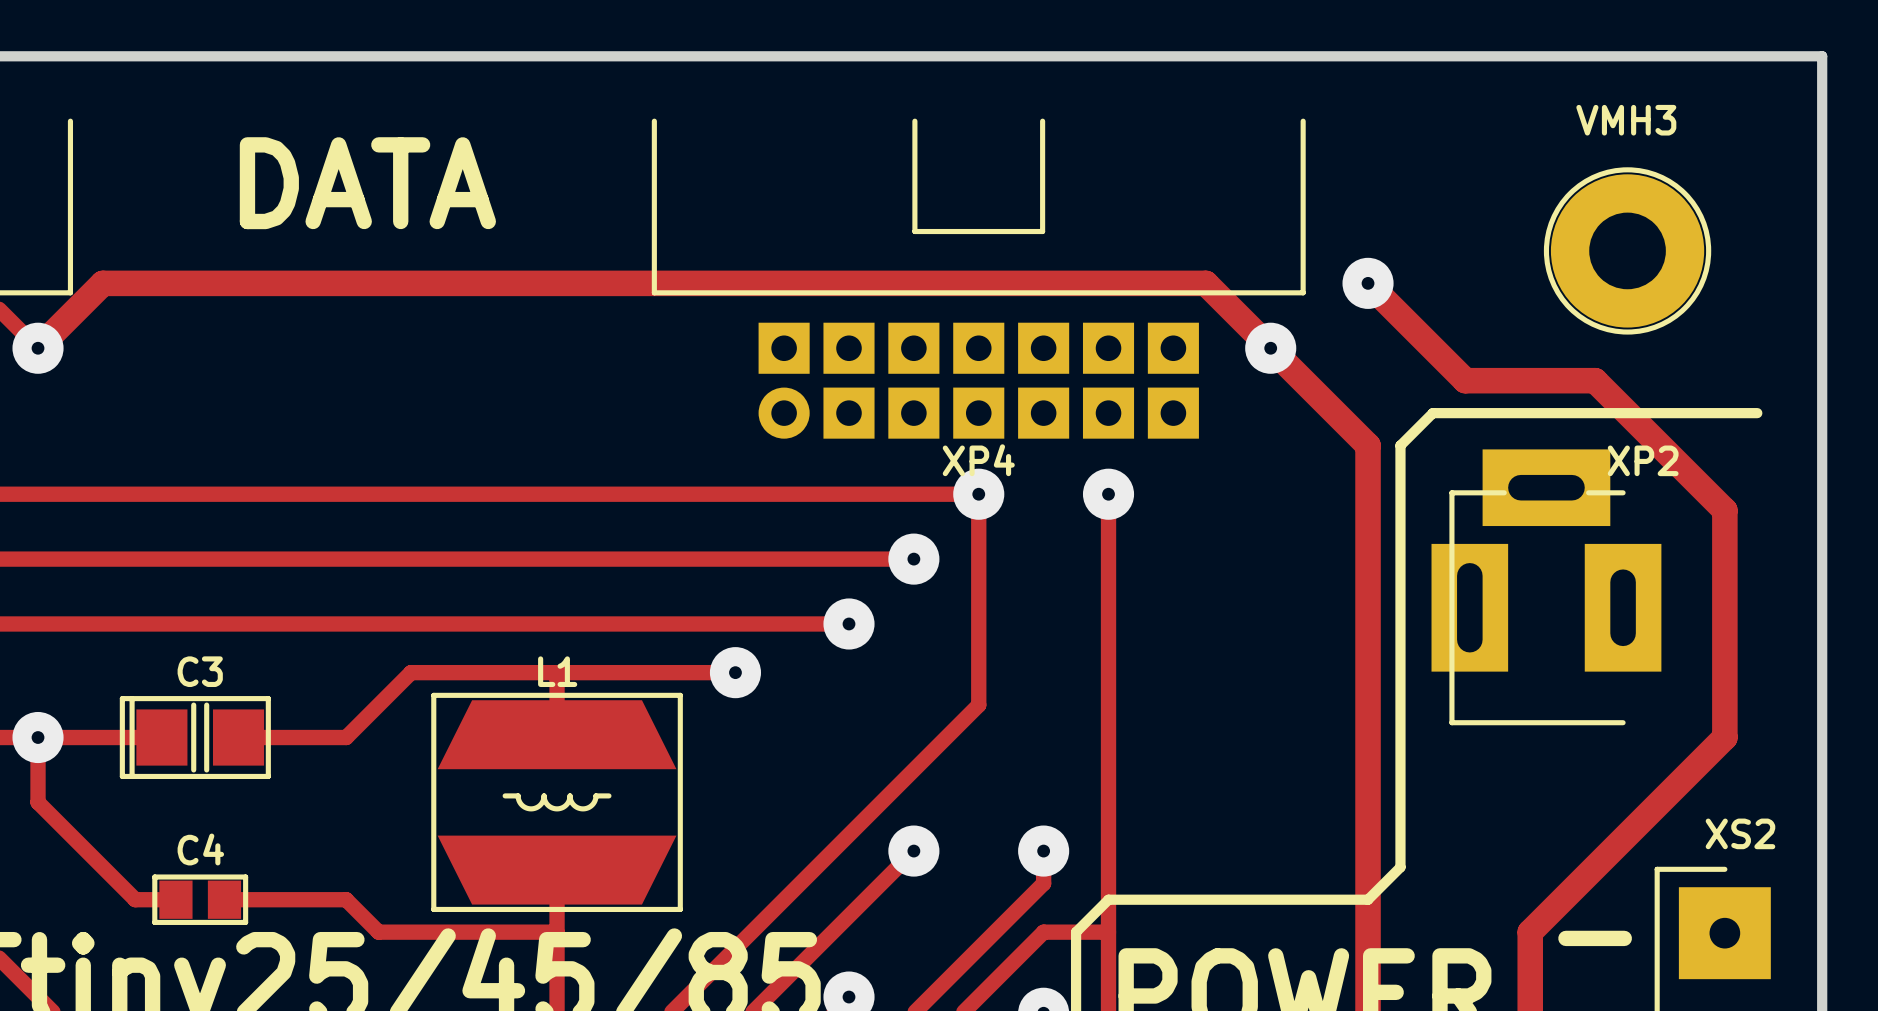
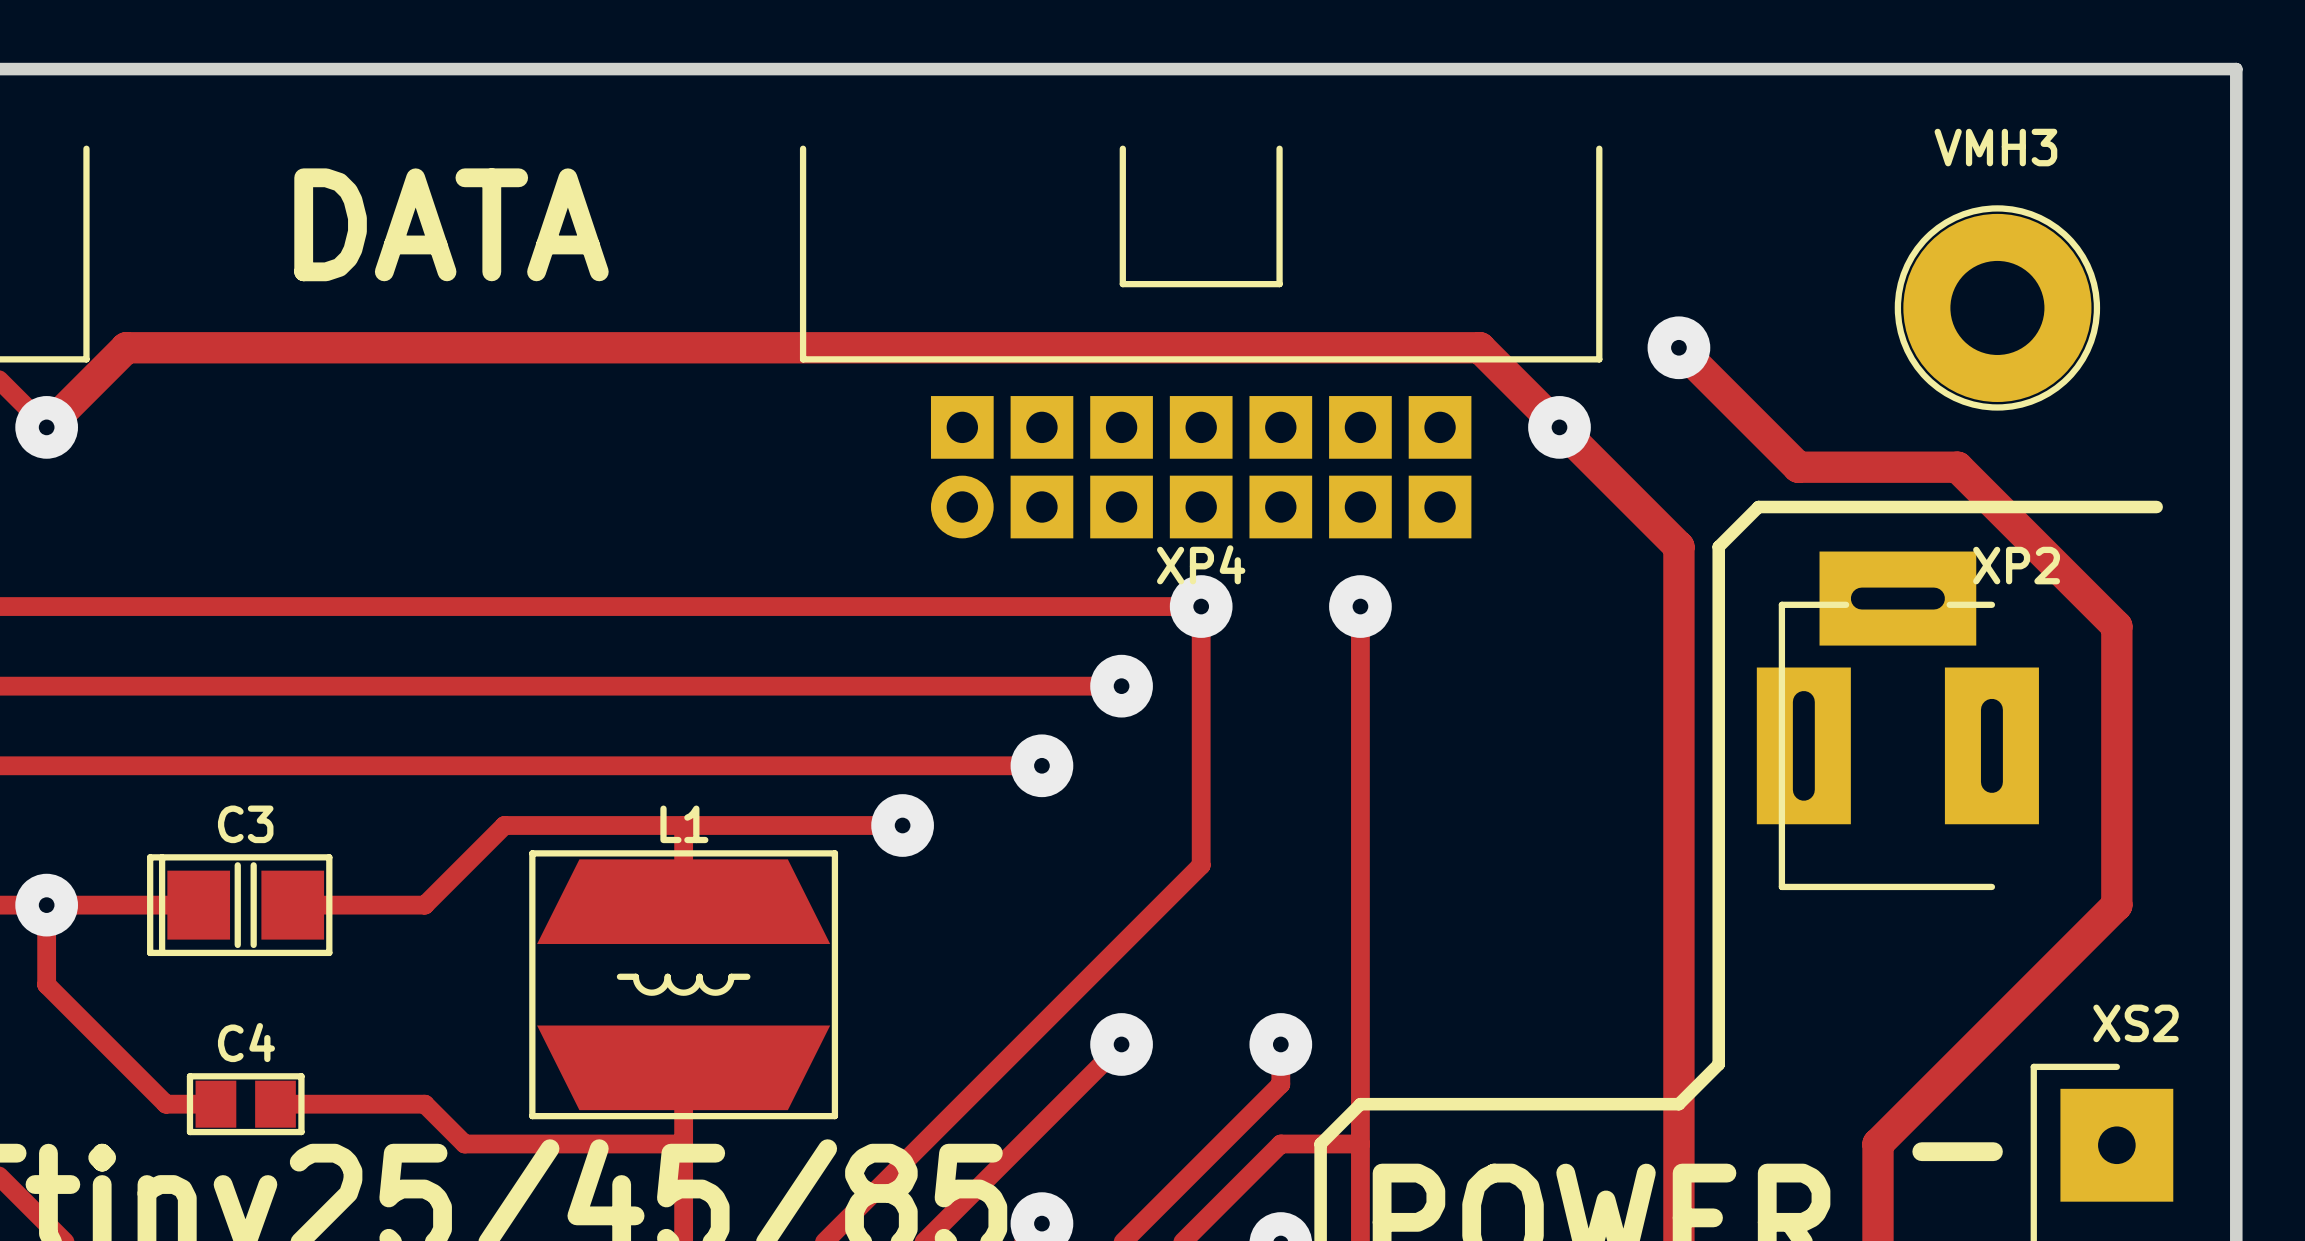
XP2 footprint: [1431, 449, 1662, 726] -> [1756, 551, 2039, 891]

